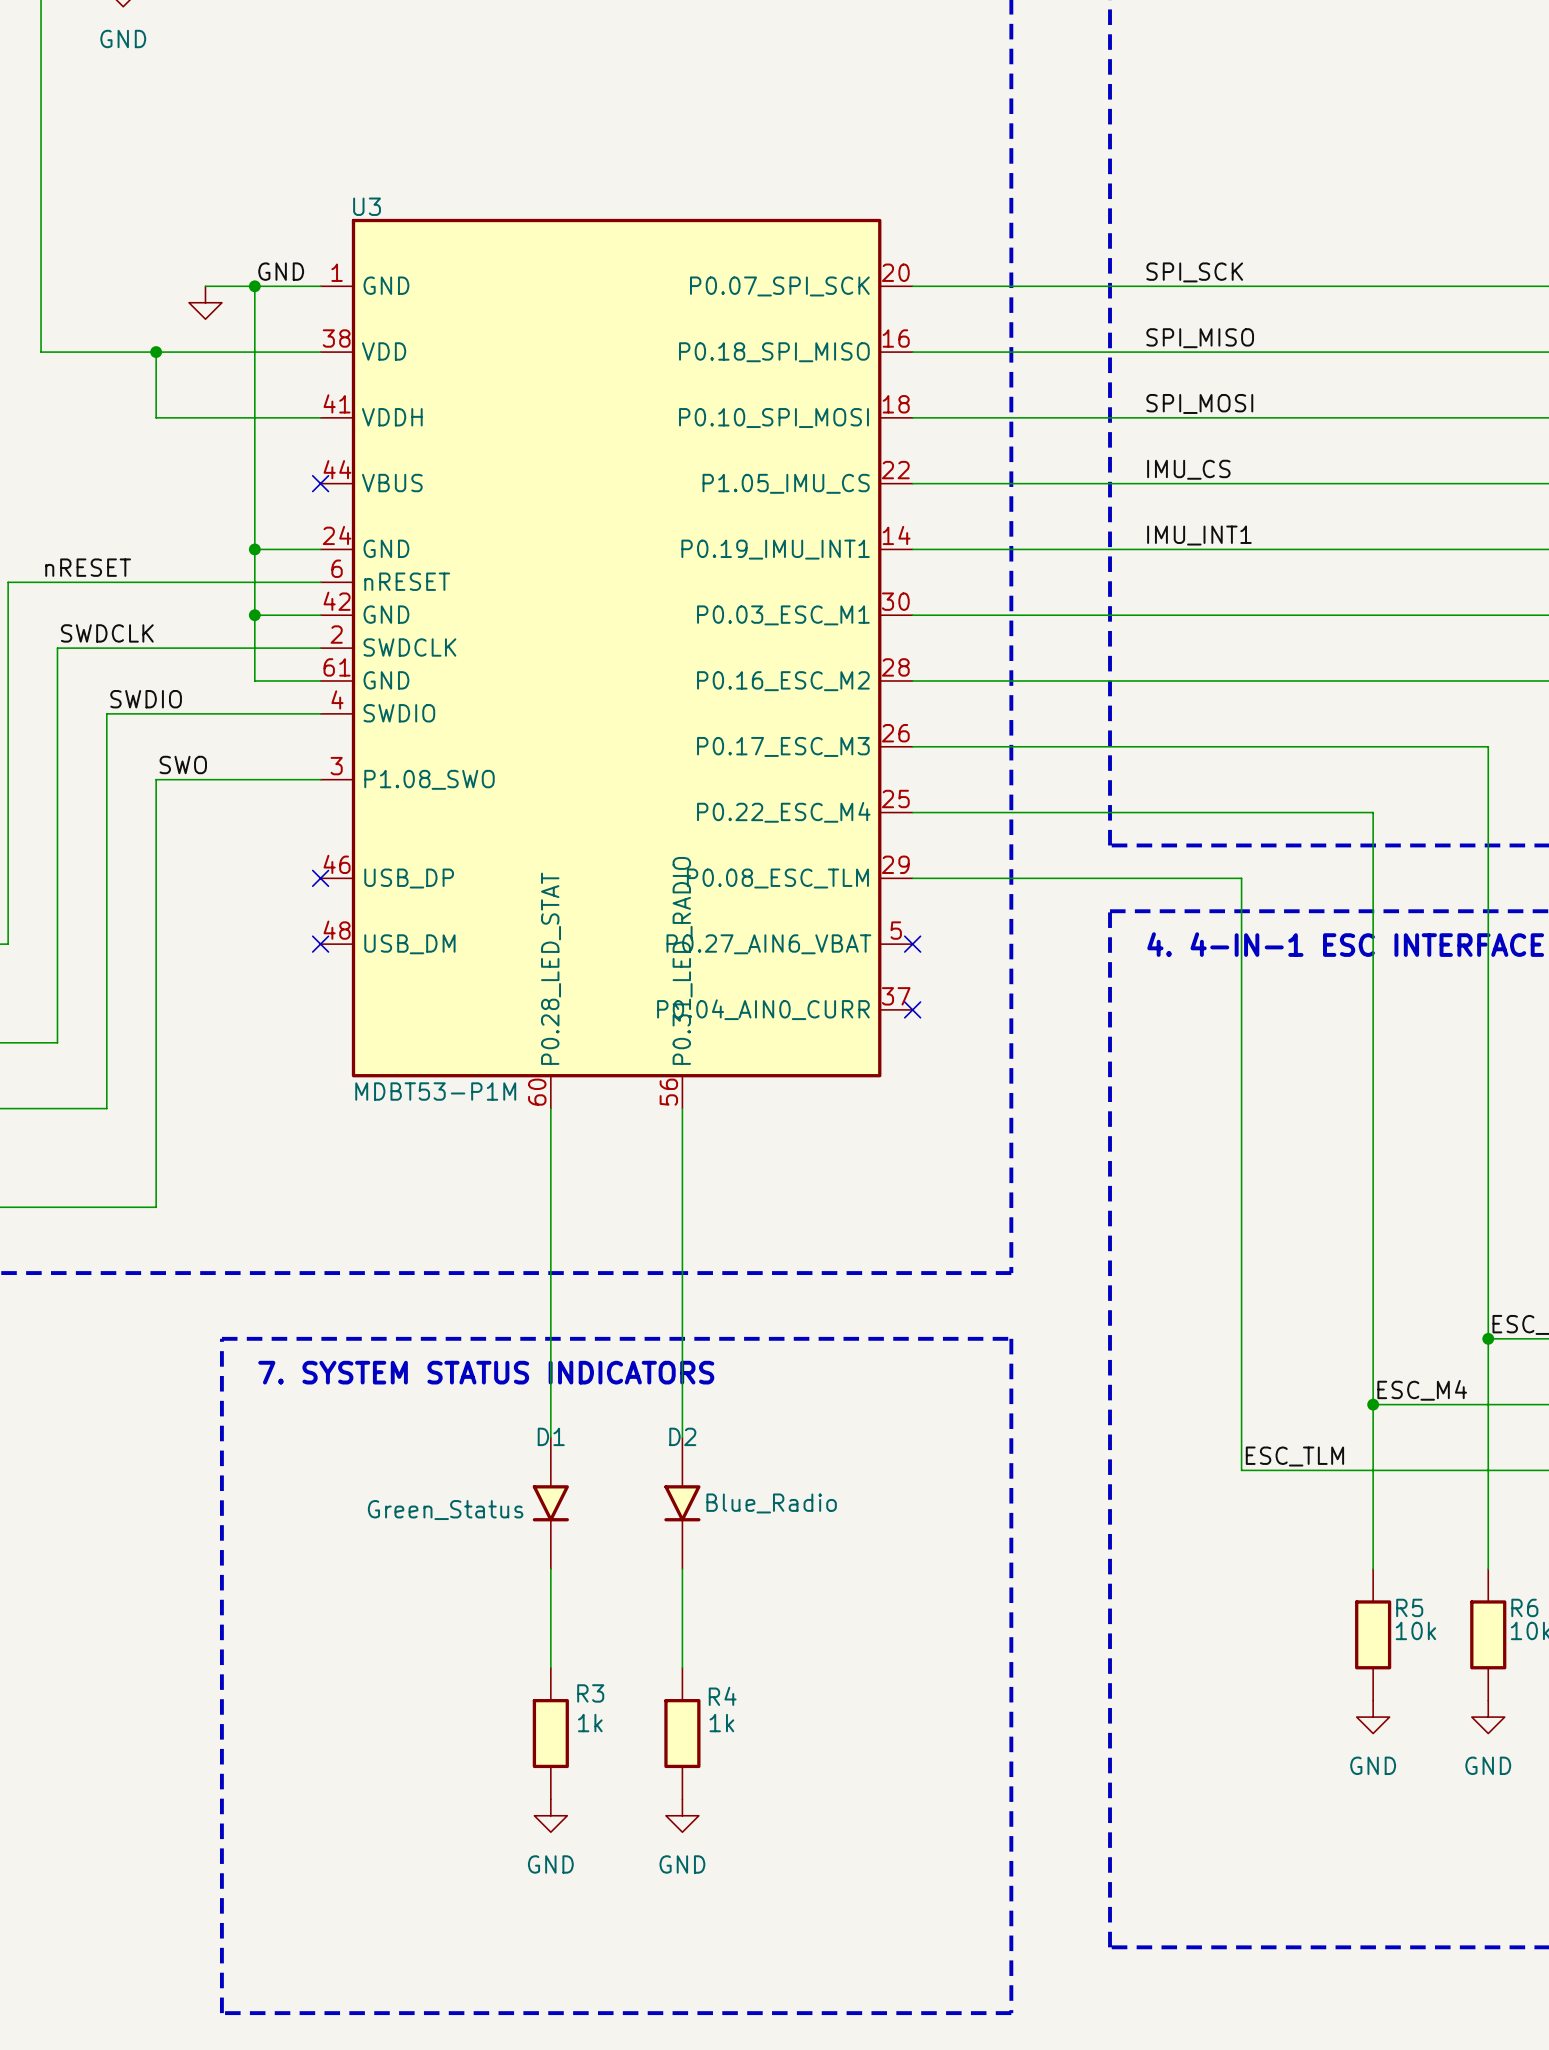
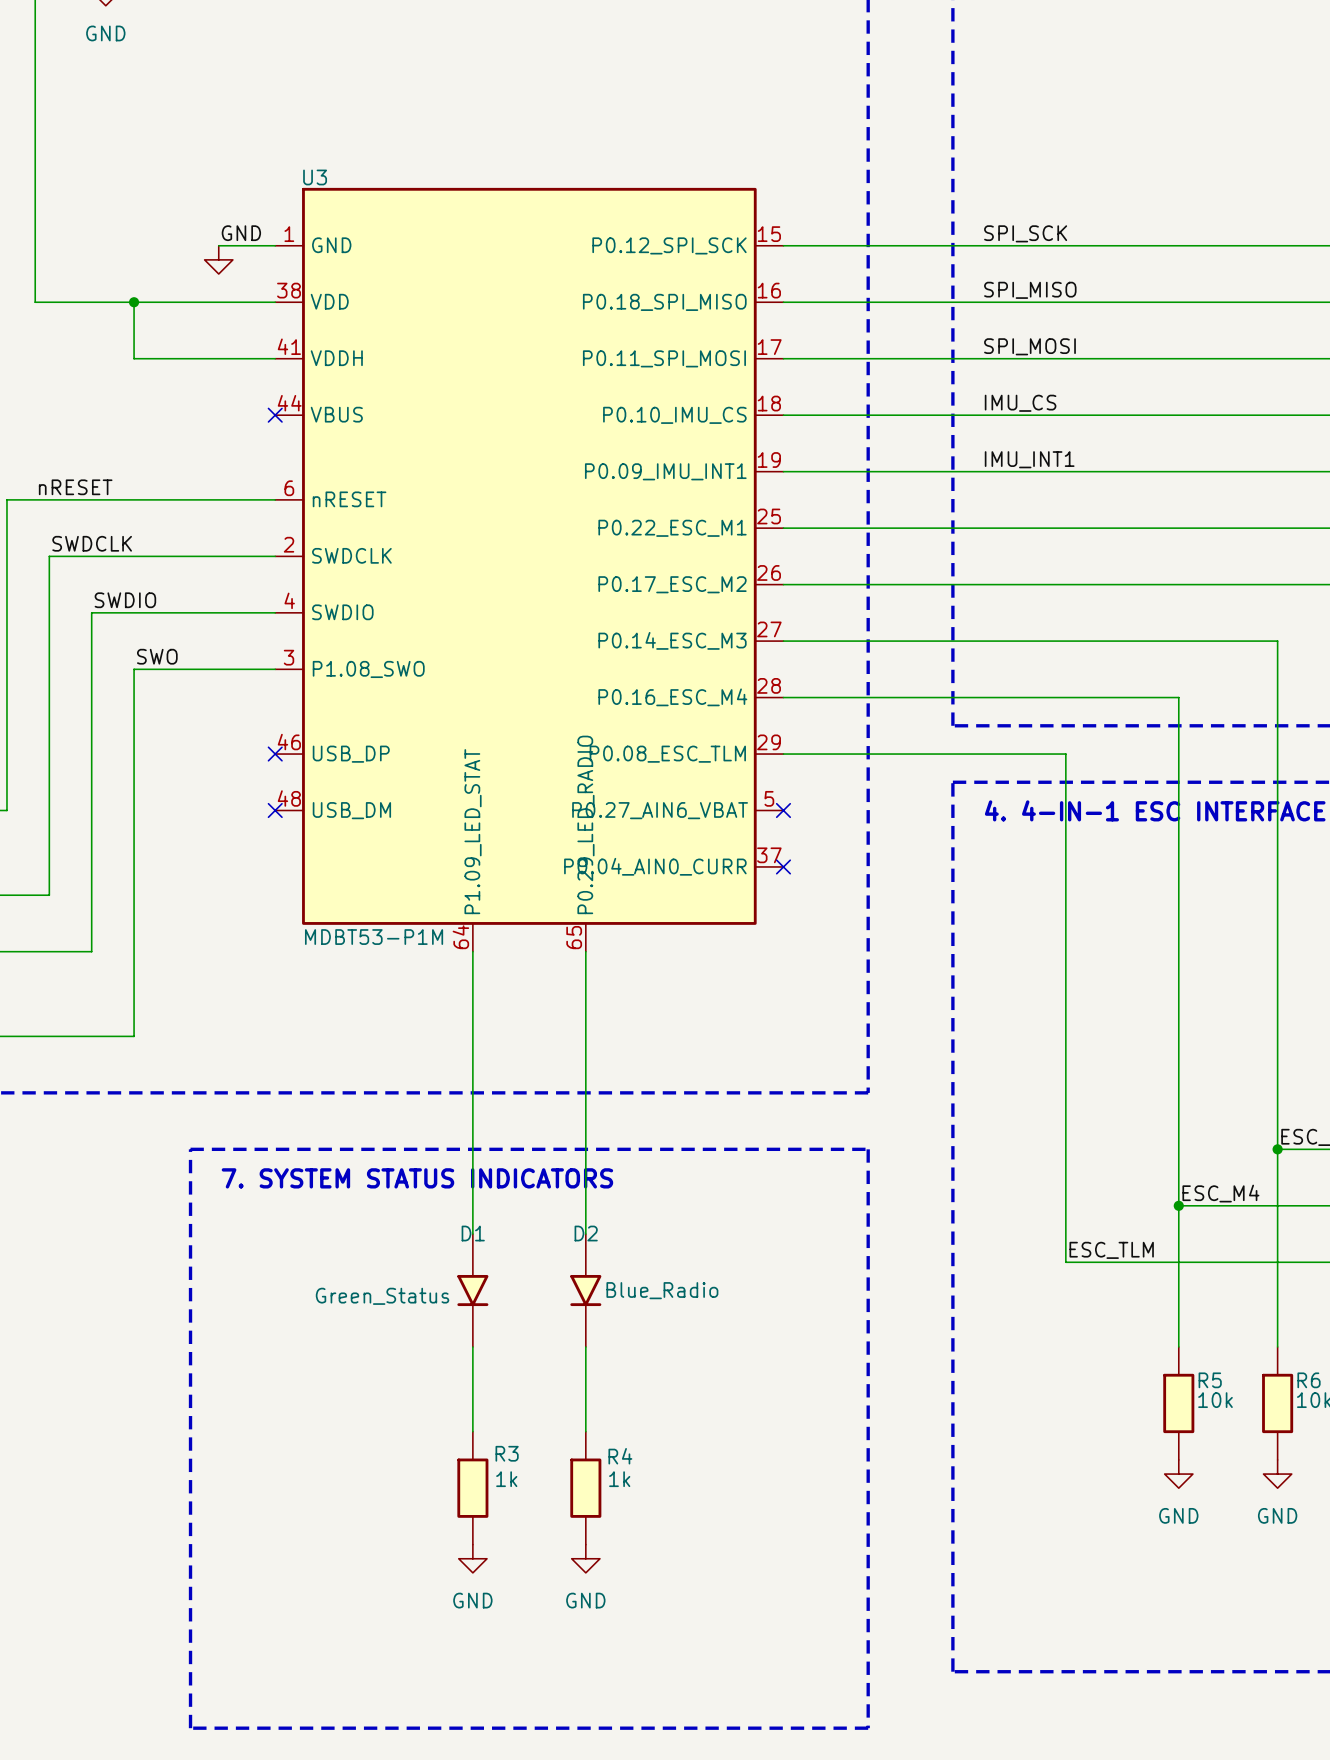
U3 symbol: [320, 218, 913, 1109] -> [275, 187, 784, 952]
wire: (205, 286) (254, 286) (254, 680) (320, 680) -> none
junction: (254, 286) -> none
power symbol position: (205, 302) -> (218, 259)
wire: (254, 549) (320, 549) -> none
junction: (254, 549) -> none
wire: (254, 615) (320, 615) -> none
junction: (254, 615) -> none

